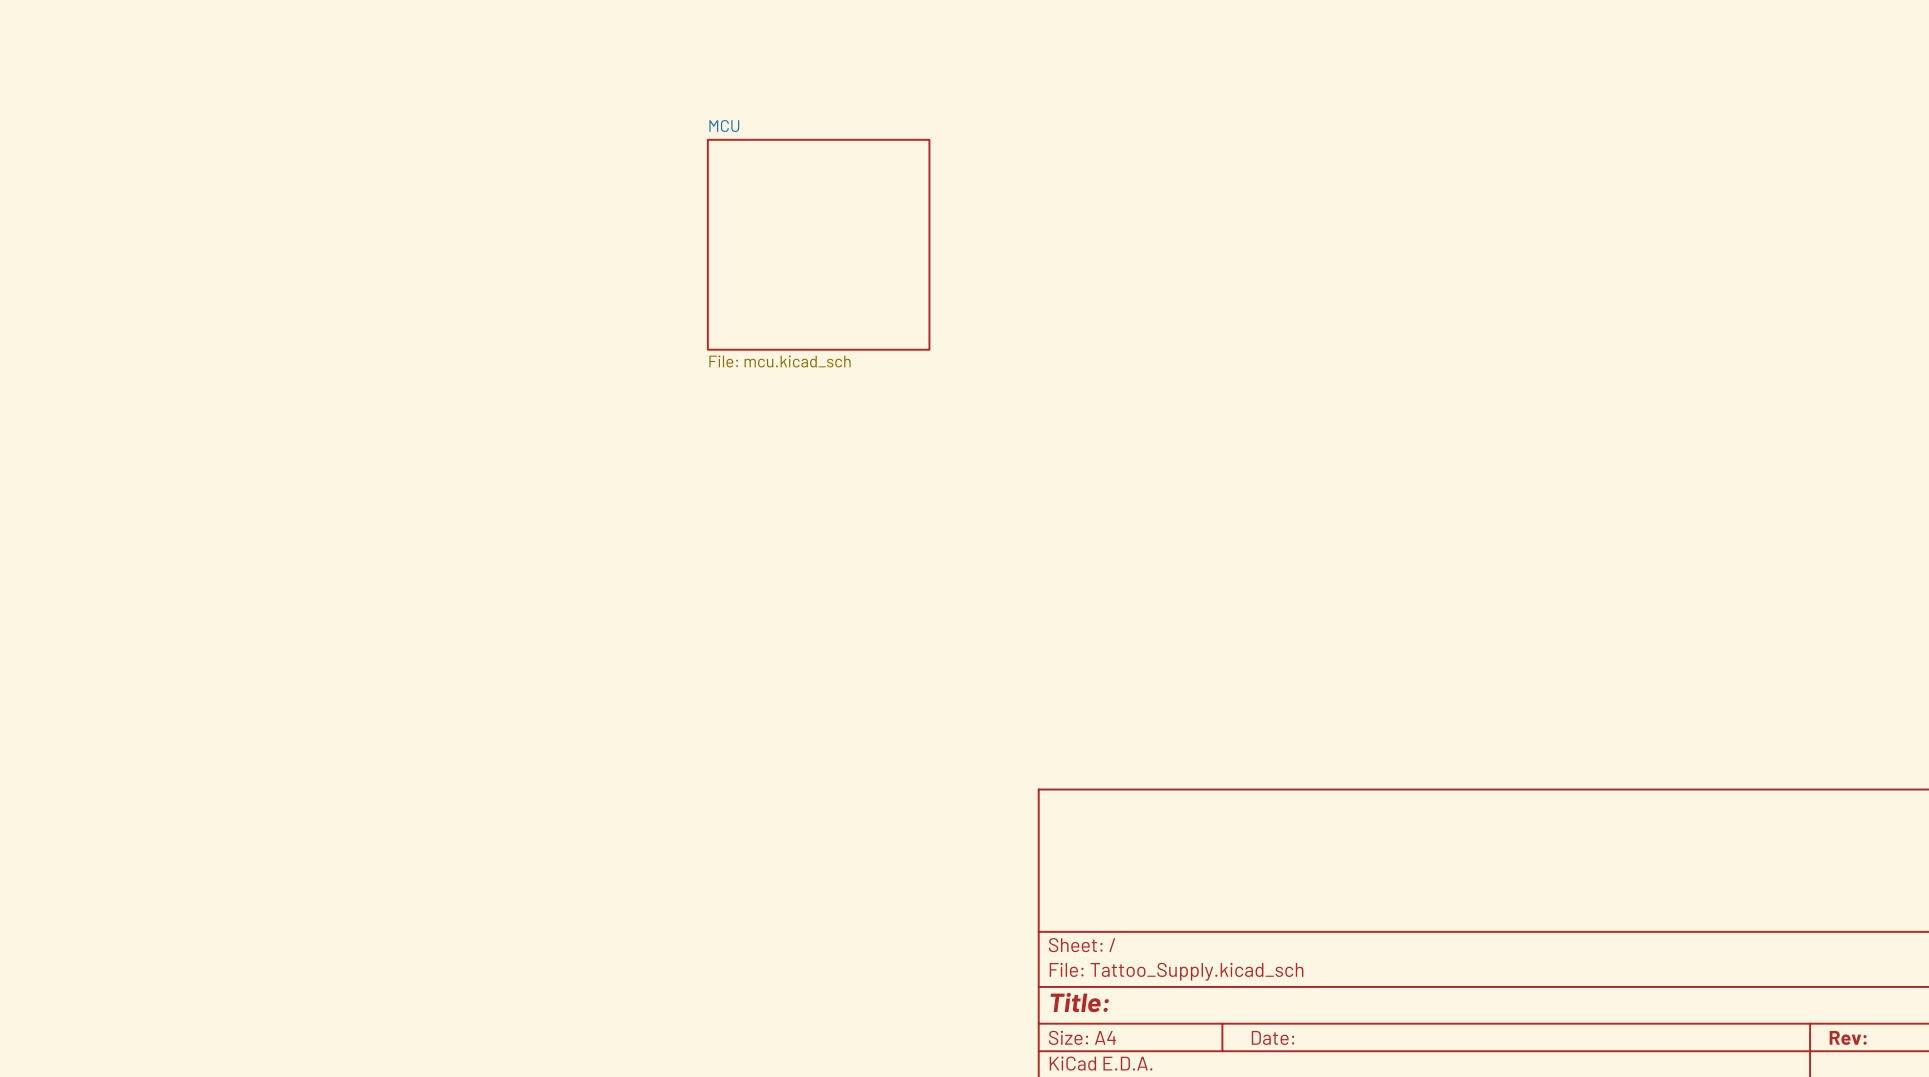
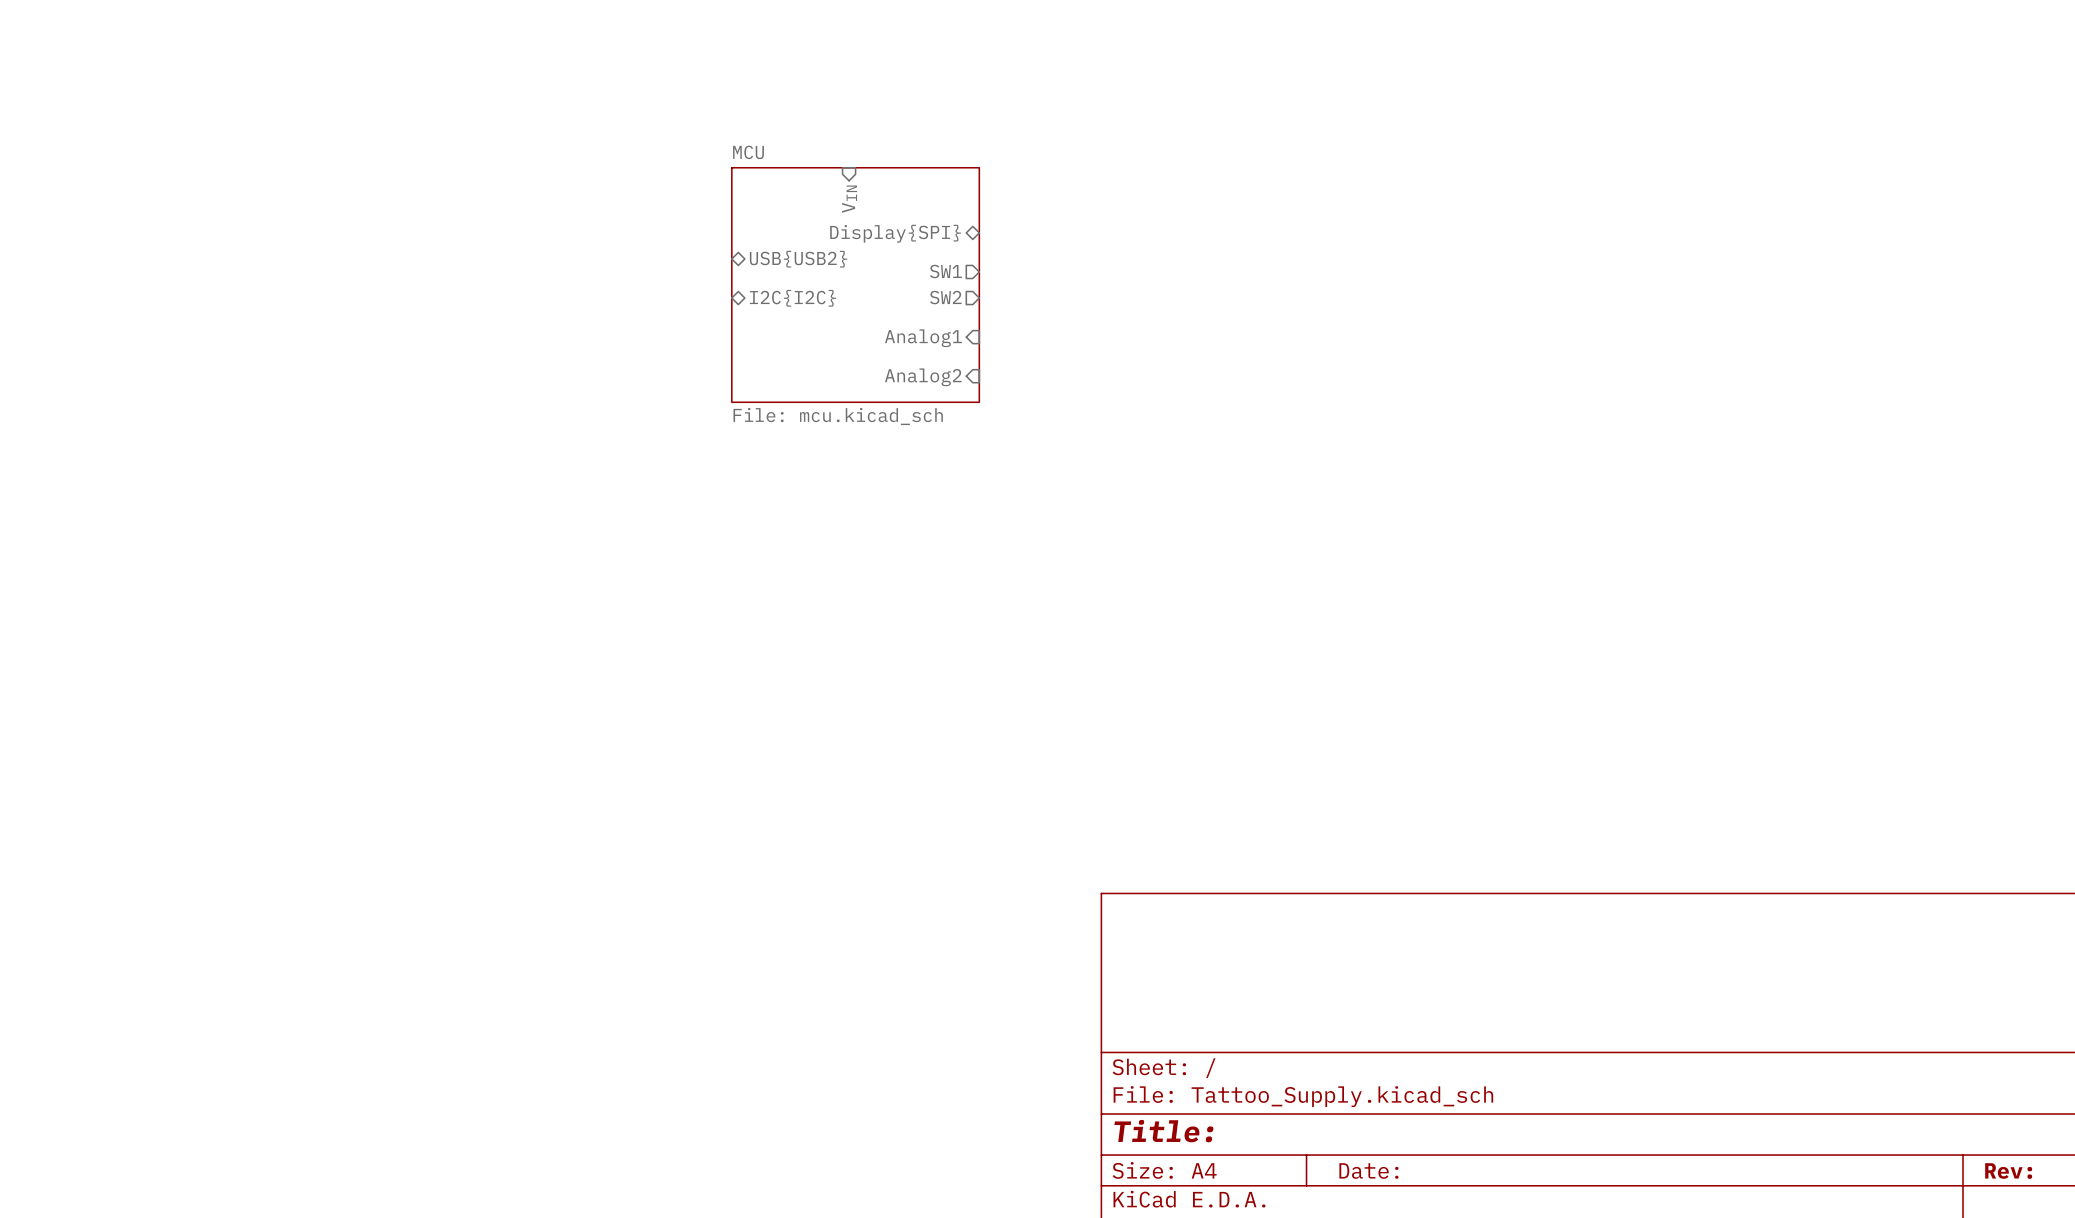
sheet pin: none -> VIN (849, 199)
sheet pin: none -> Display{SPI} (895, 233)
sheet pin: none -> USB{USB2} (798, 259)
sheet pin: none -> SW1 (945, 271)
sheet pin: none -> I2C{I2C} (792, 298)
sheet pin: none -> SW2 (945, 297)
sheet pin: none -> Analog1 (923, 338)
sheet pin: none -> Analog2 (923, 377)

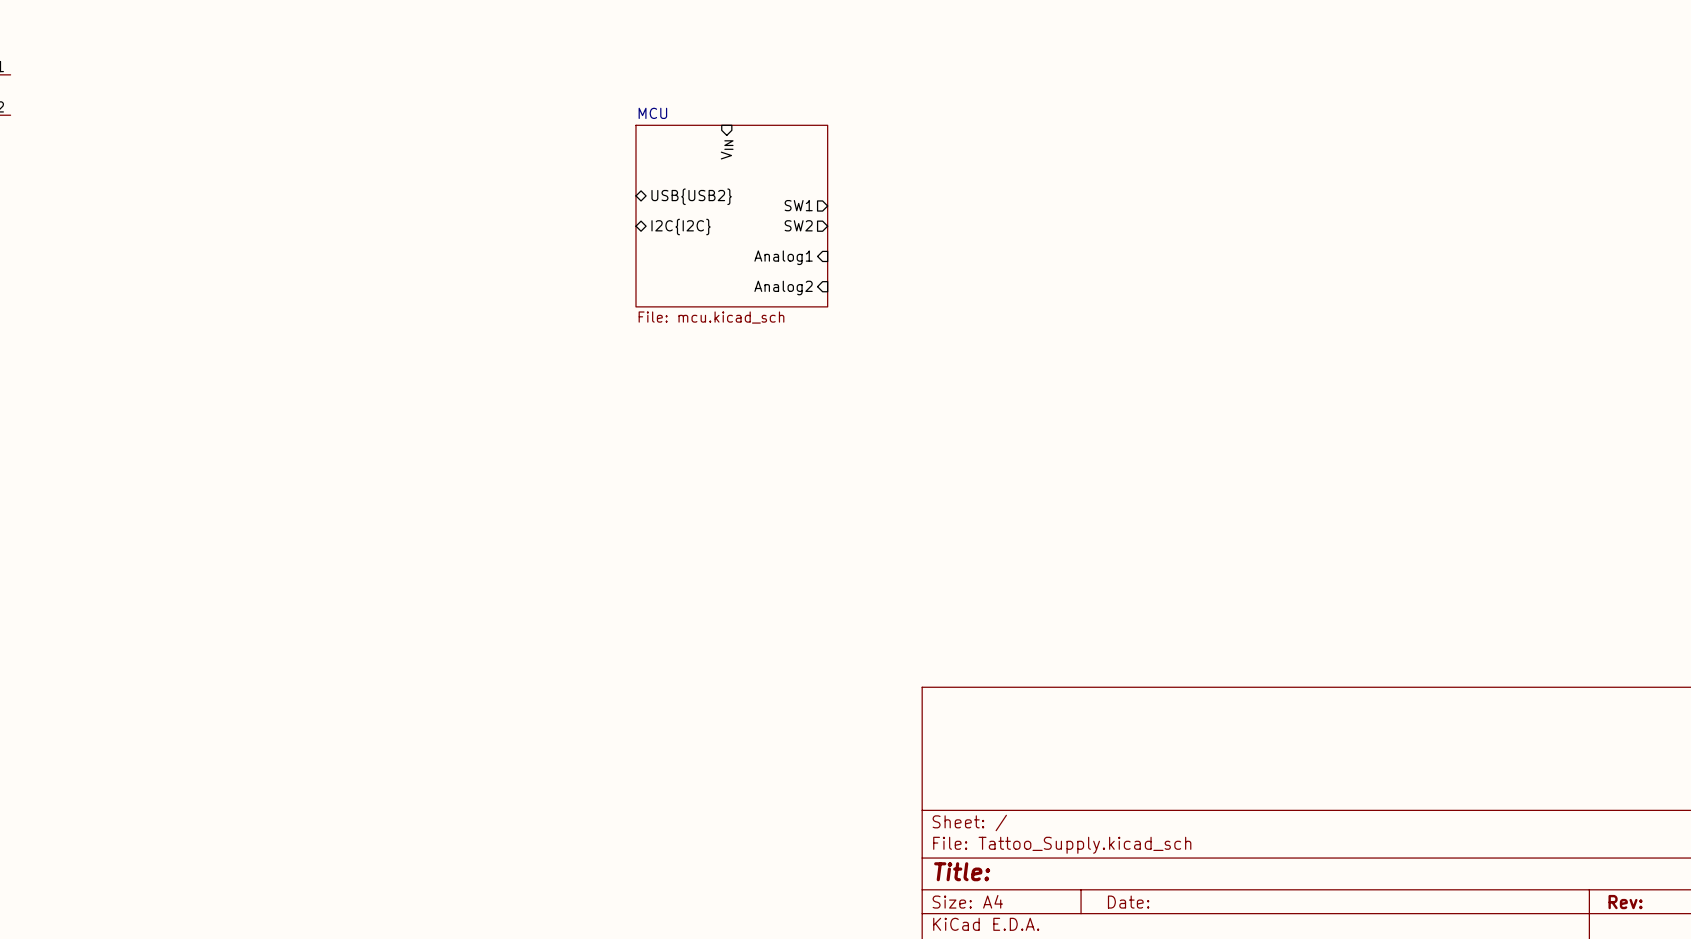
sheet pin: Display{SPI} (895, 233) -> none

